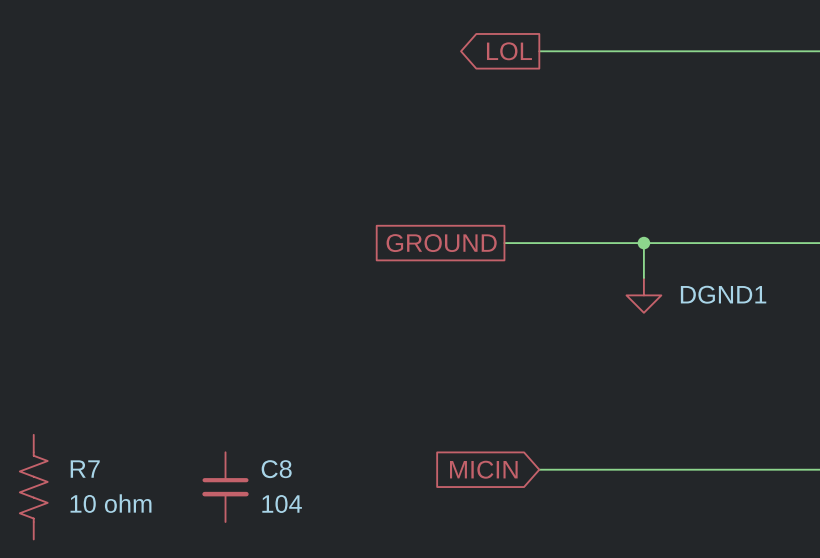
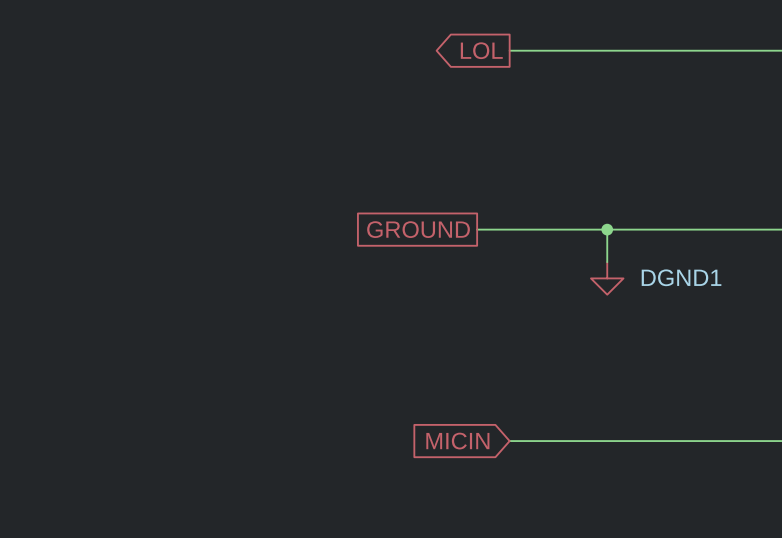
R7: 10 ohm (33, 487) -> none
C8: 104 (225, 487) -> none

